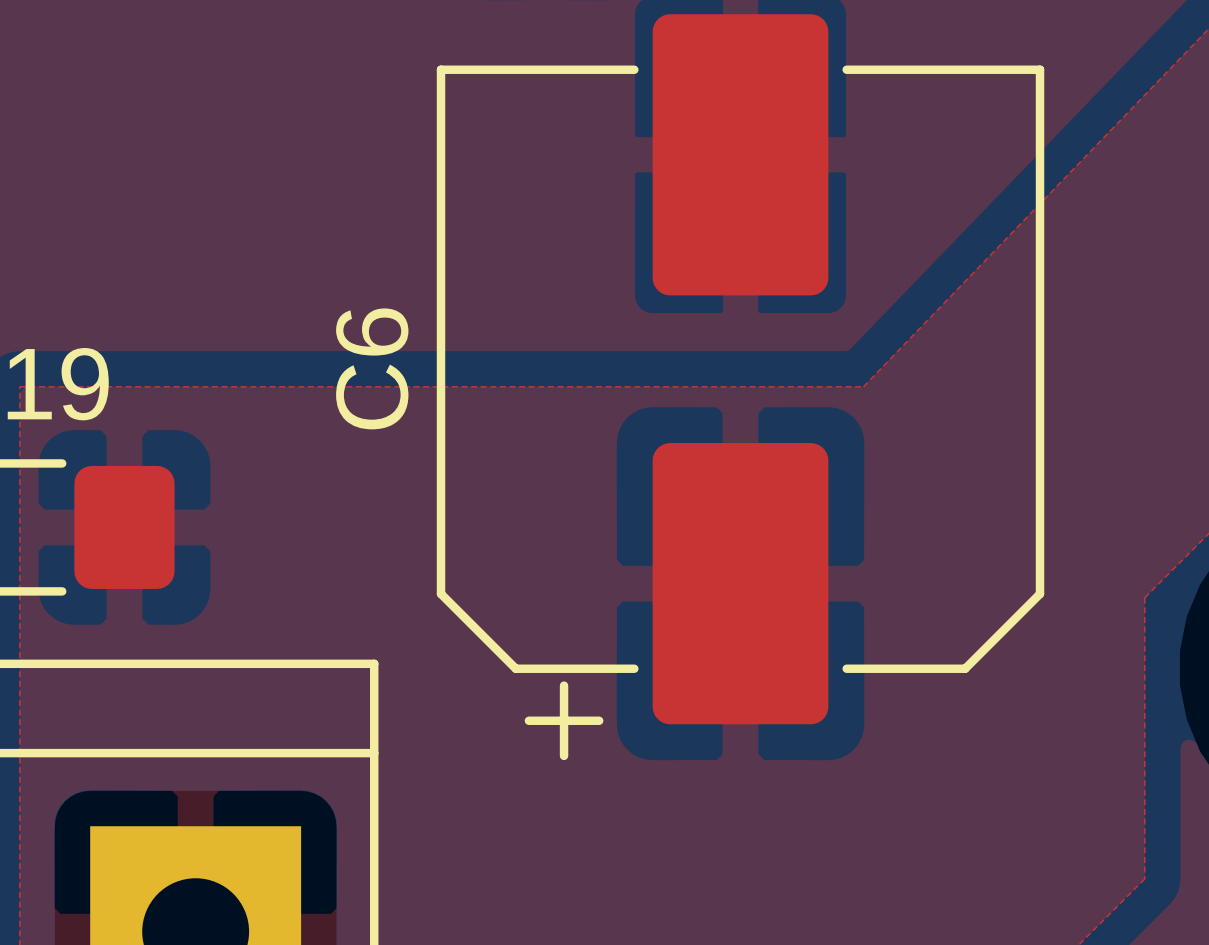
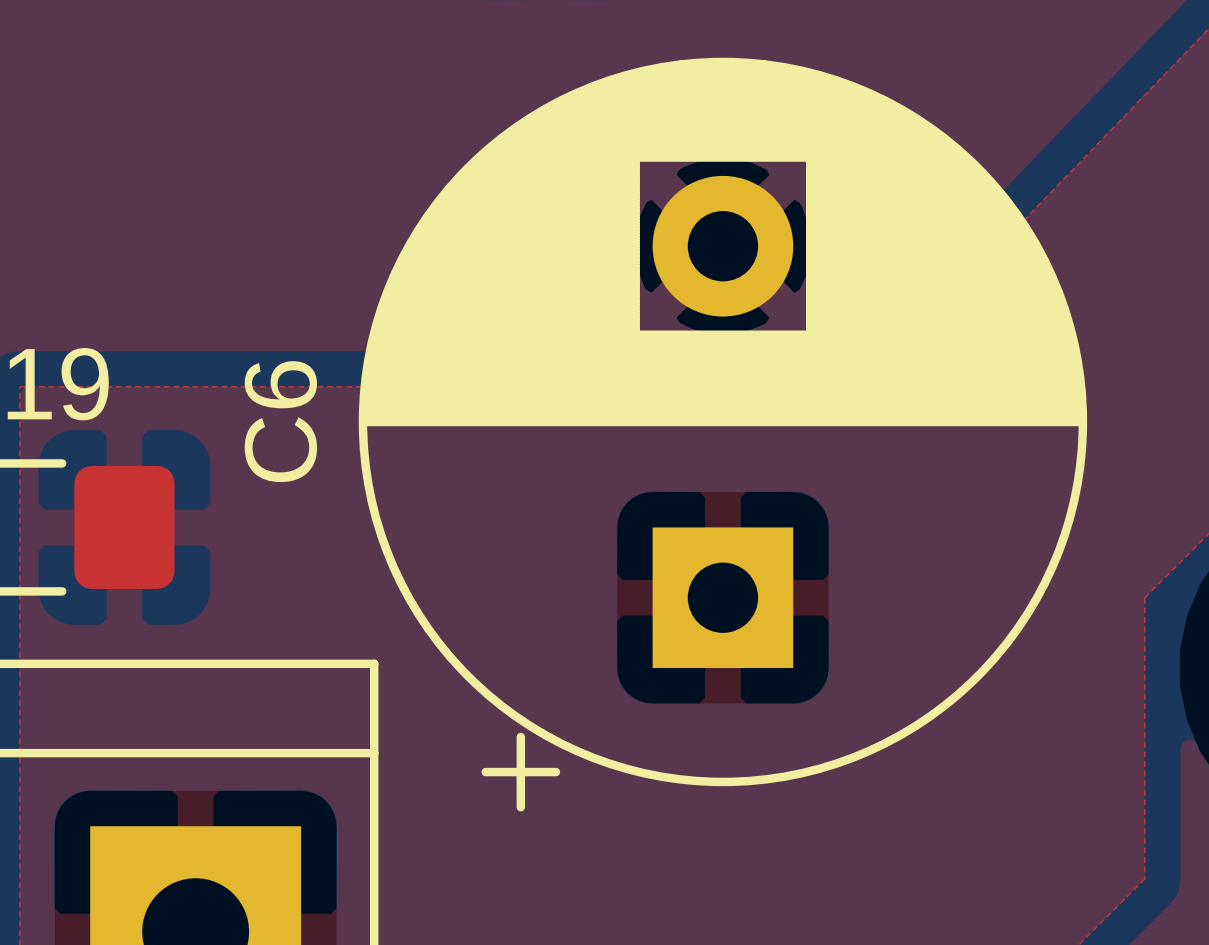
C6 footprint: [436, 14, 1045, 761] -> [358, 57, 1088, 812]

